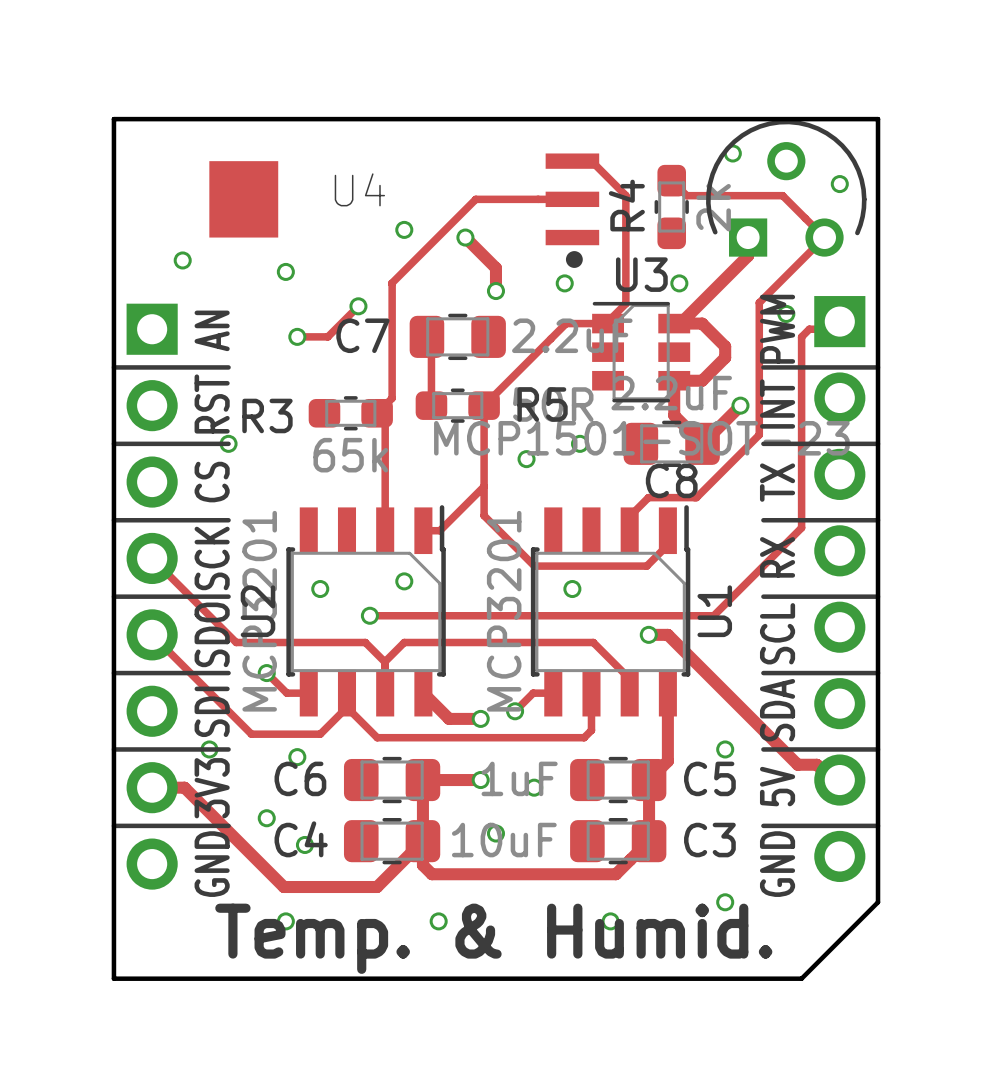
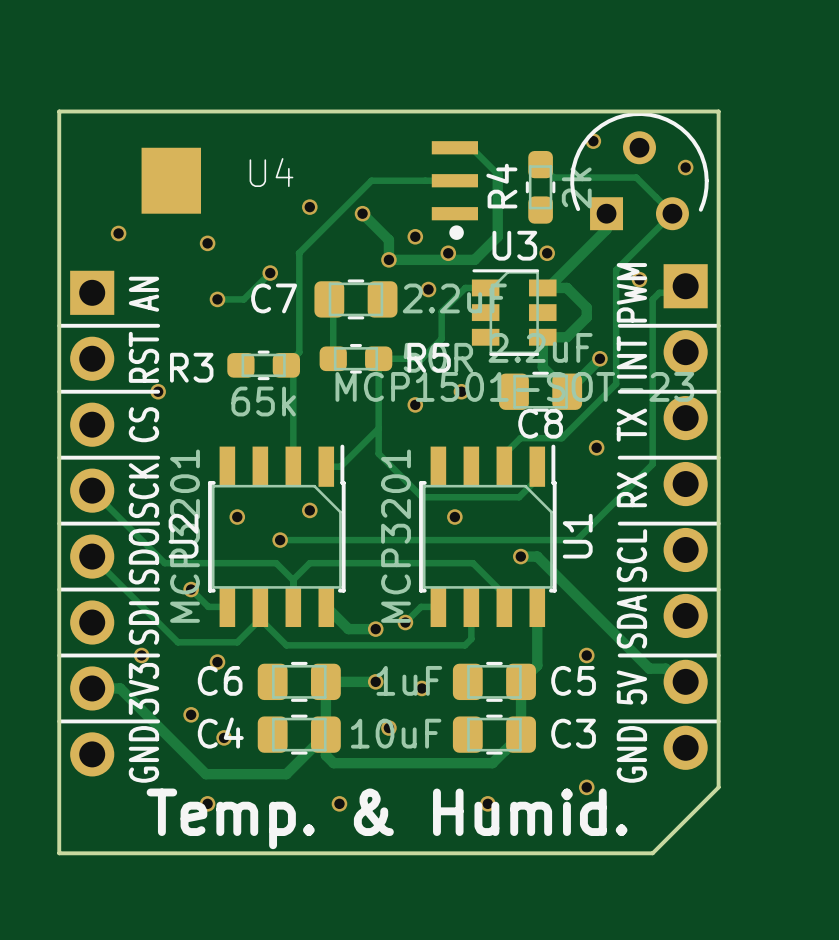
track: (622, 191) (625, 195) (625, 303) (608, 321) -> (497, 174) (497, 236) (474, 259) (388, 259)
via: none -> (415, 236)
track: (584, 323) (566, 323) (484, 405) -> (465, 287) (441, 311) (441, 338) (421, 358) (378, 358)
via: none -> (428, 289)
via: none -> (596, 447)

